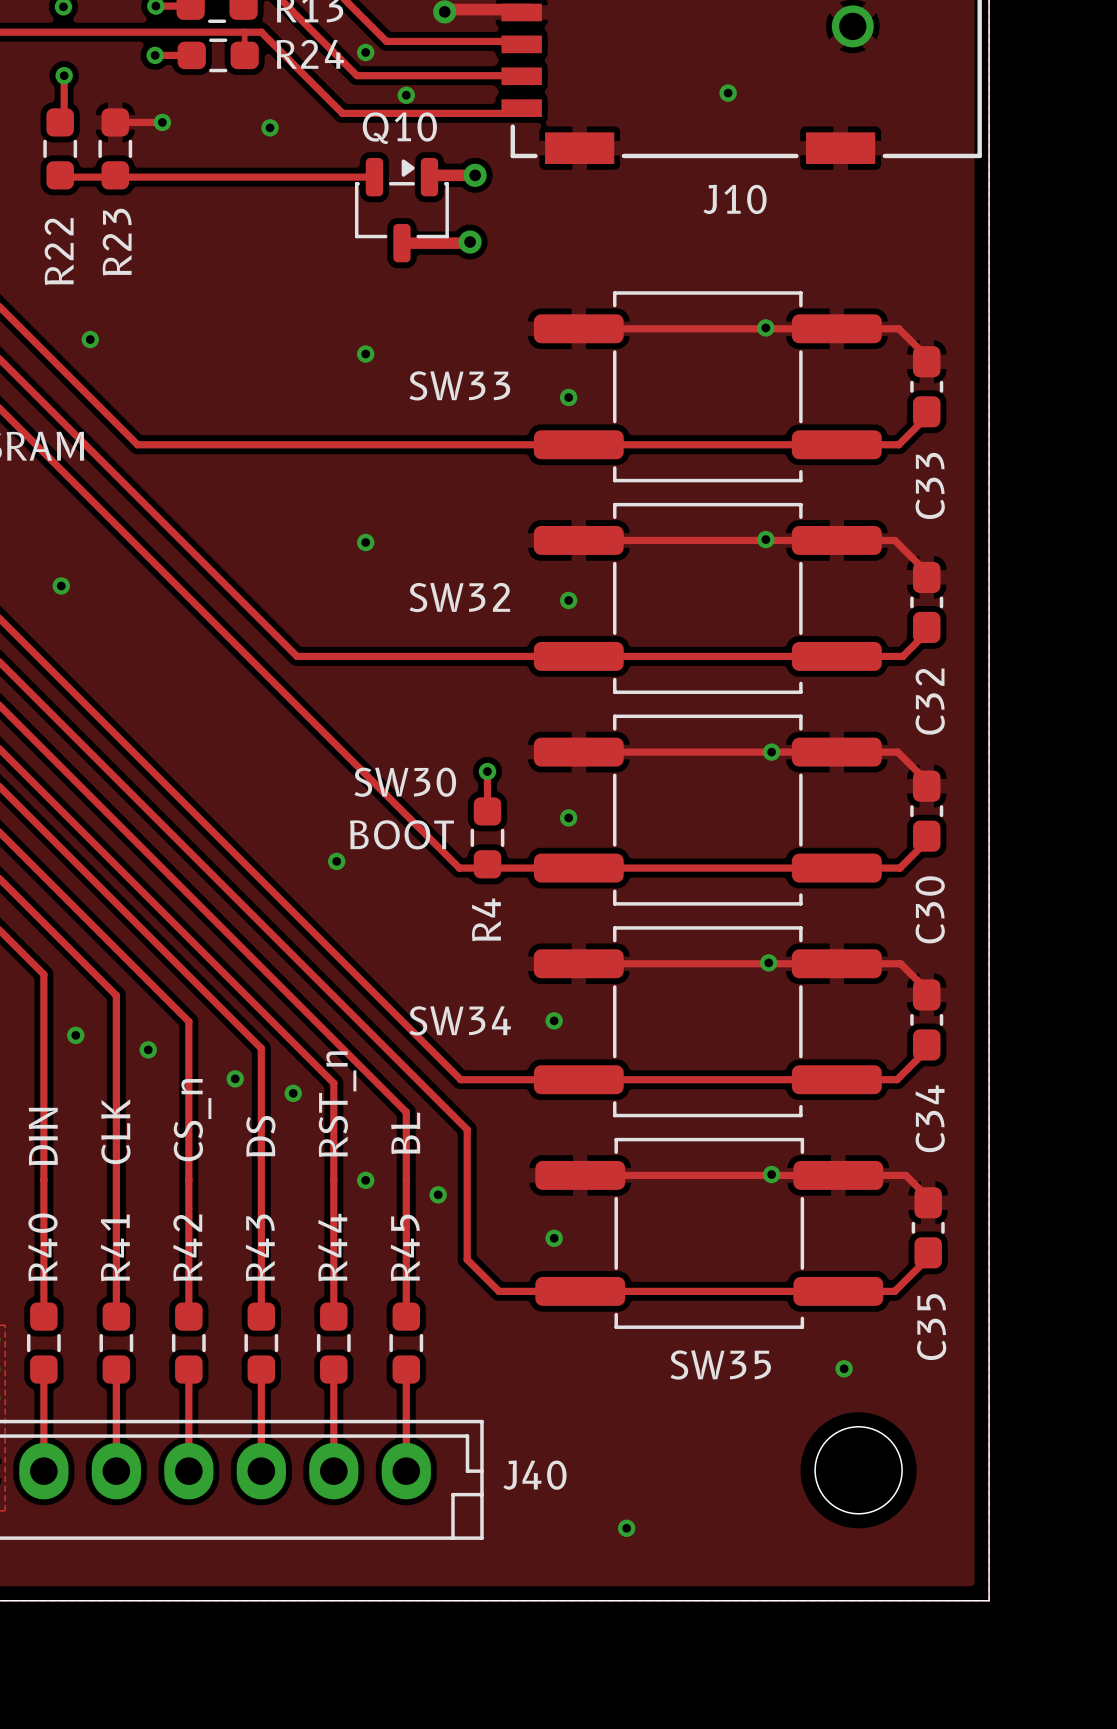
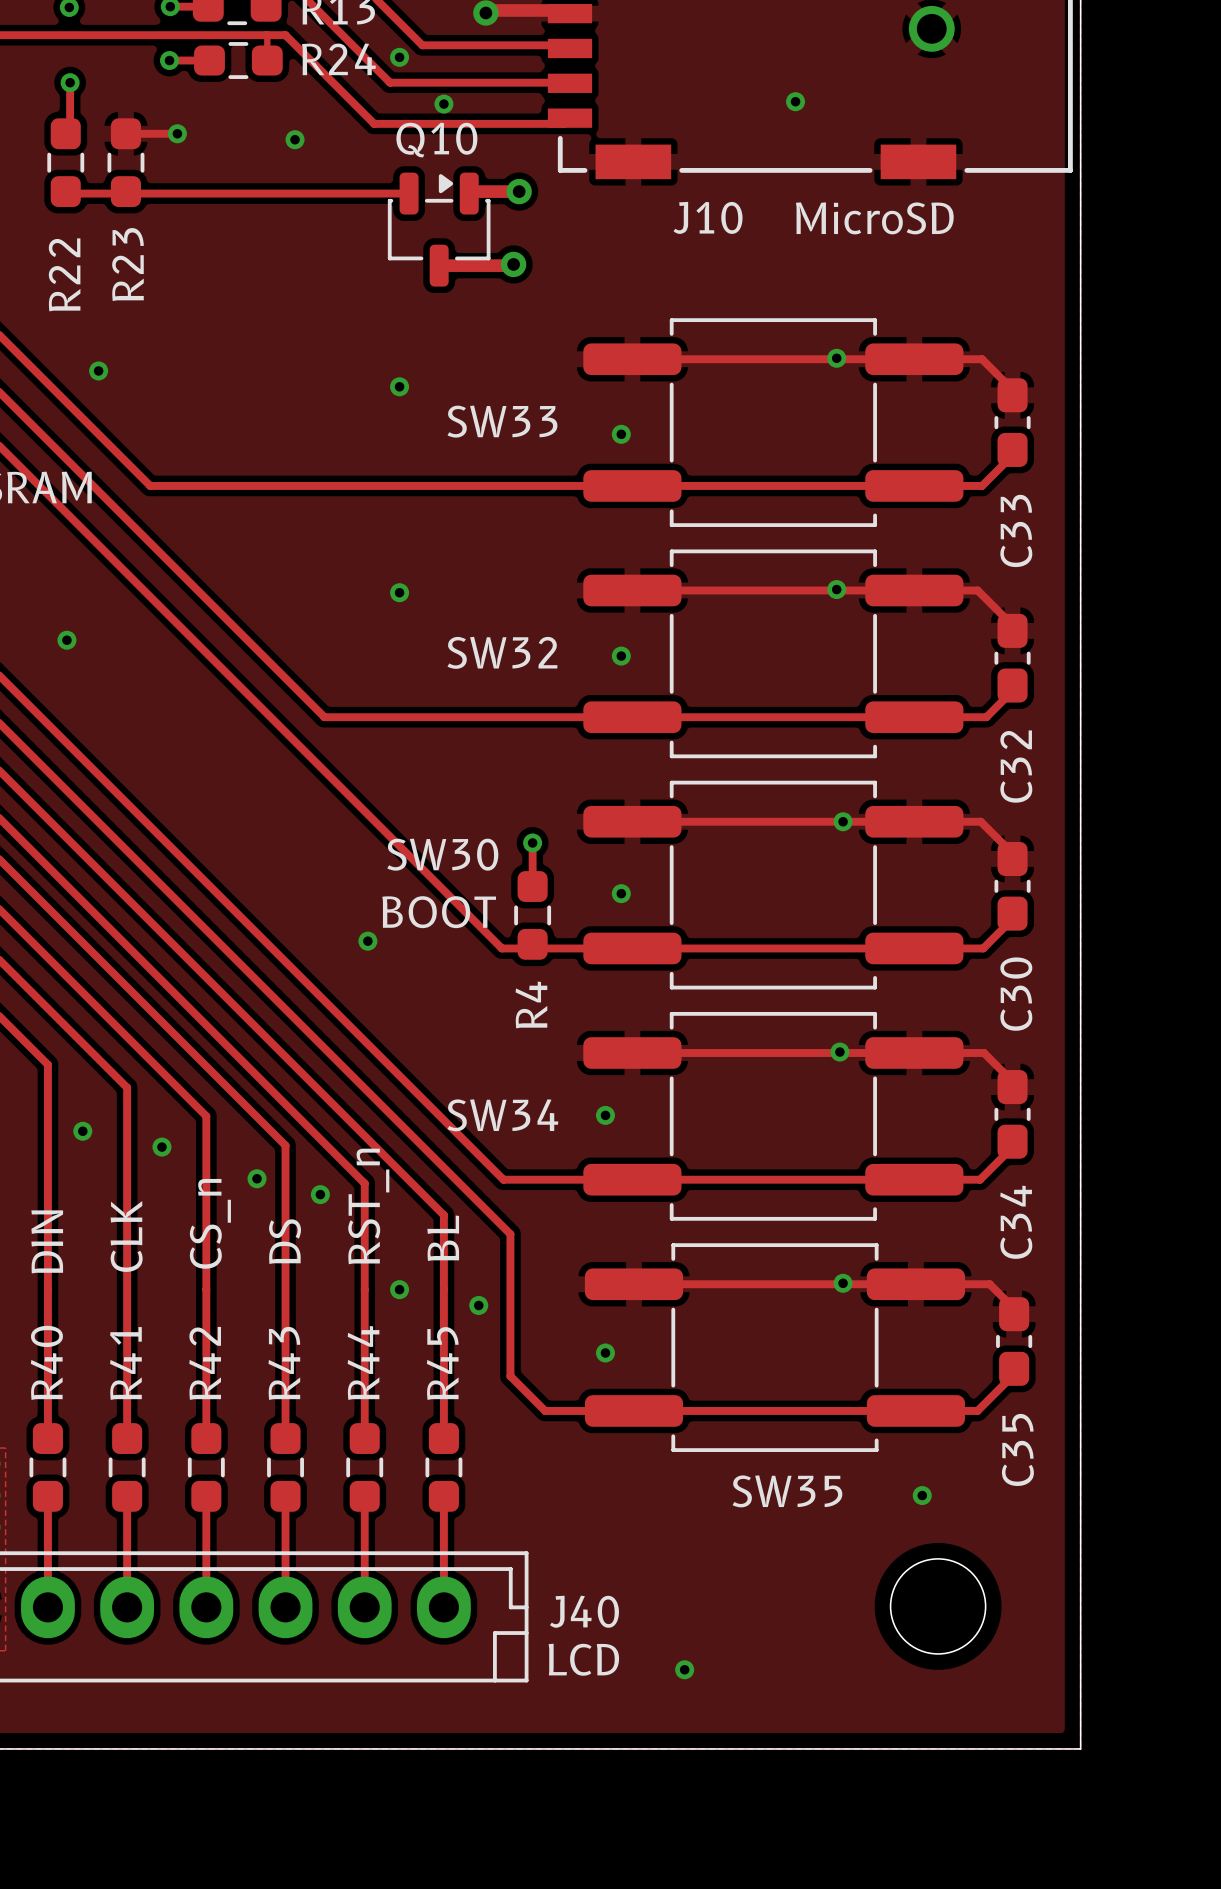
J10 name position: J10 (735, 199) -> J10 (708, 217)
text: none -> MicroSD (874, 218)
text: none -> LCD (583, 1659)

